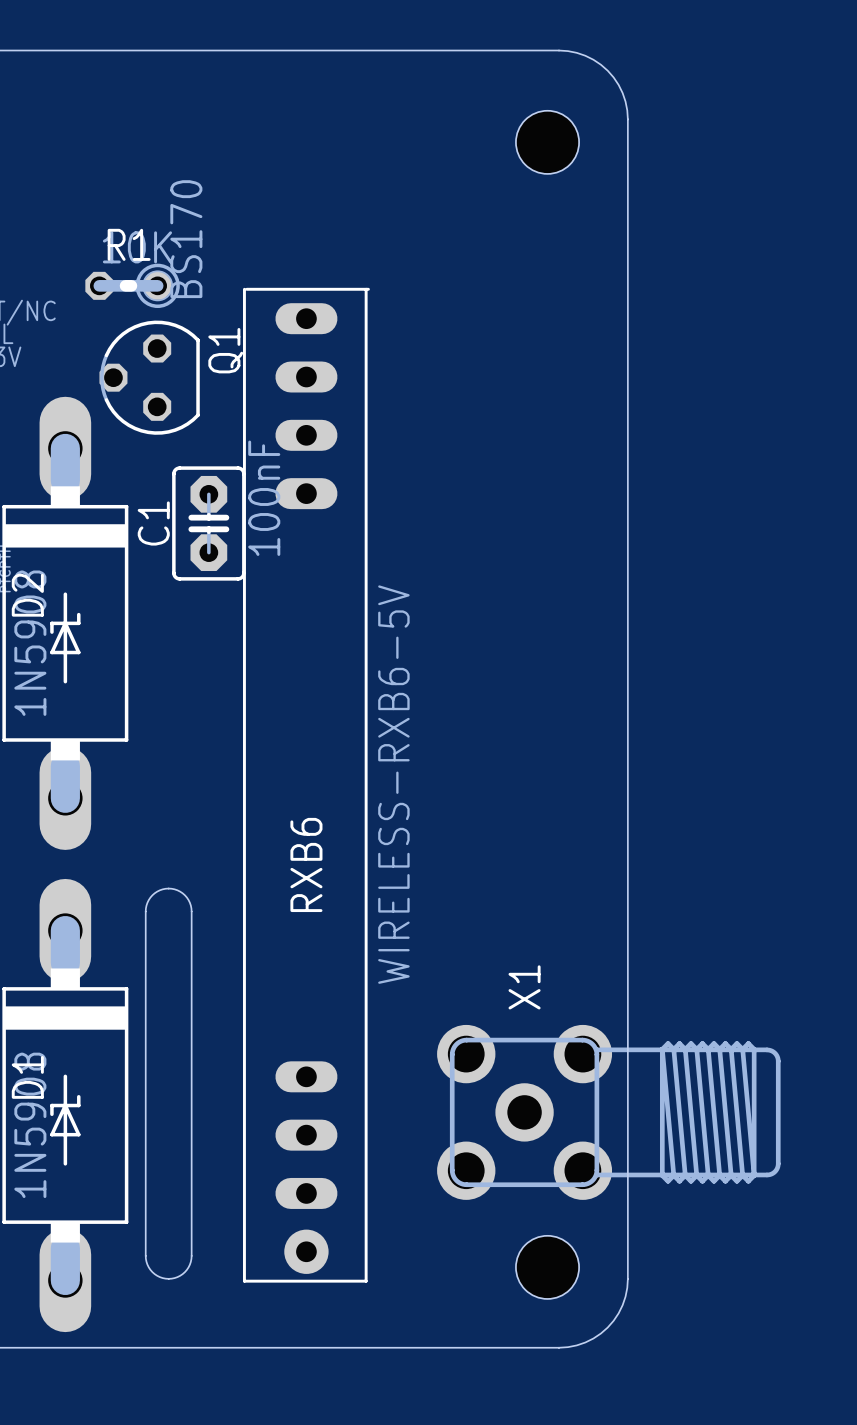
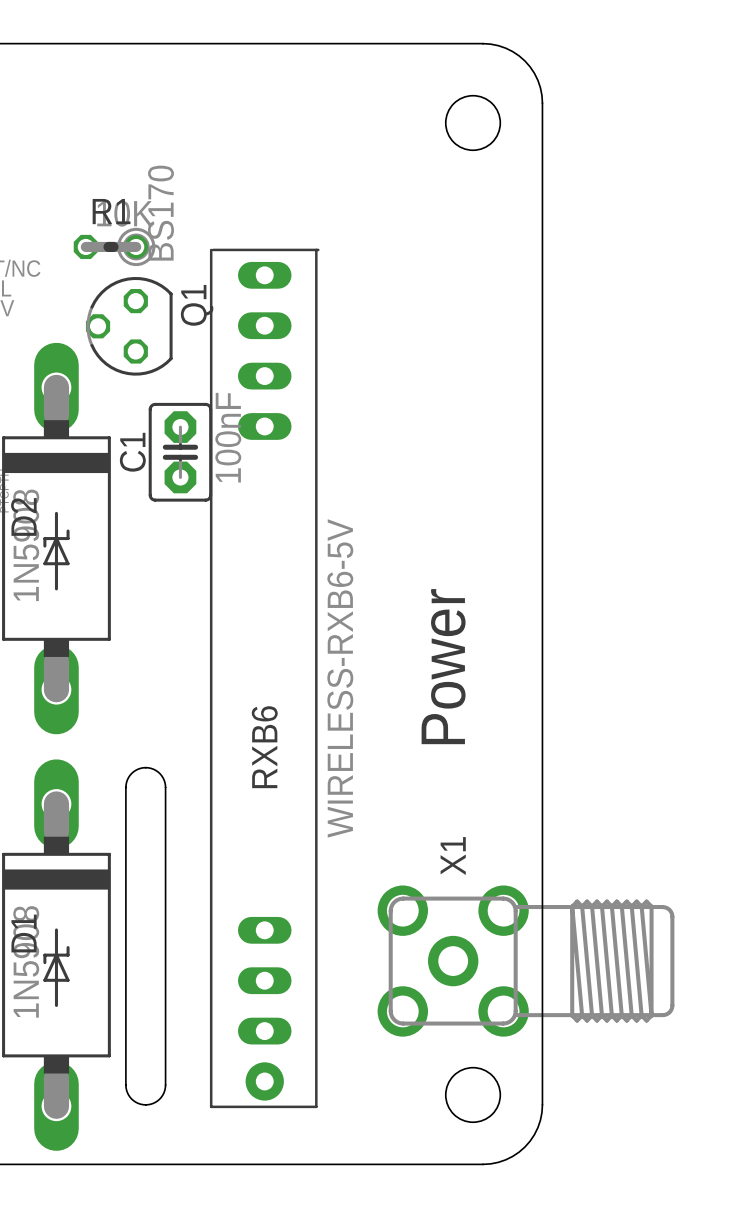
text: none -> Power (443, 666)

